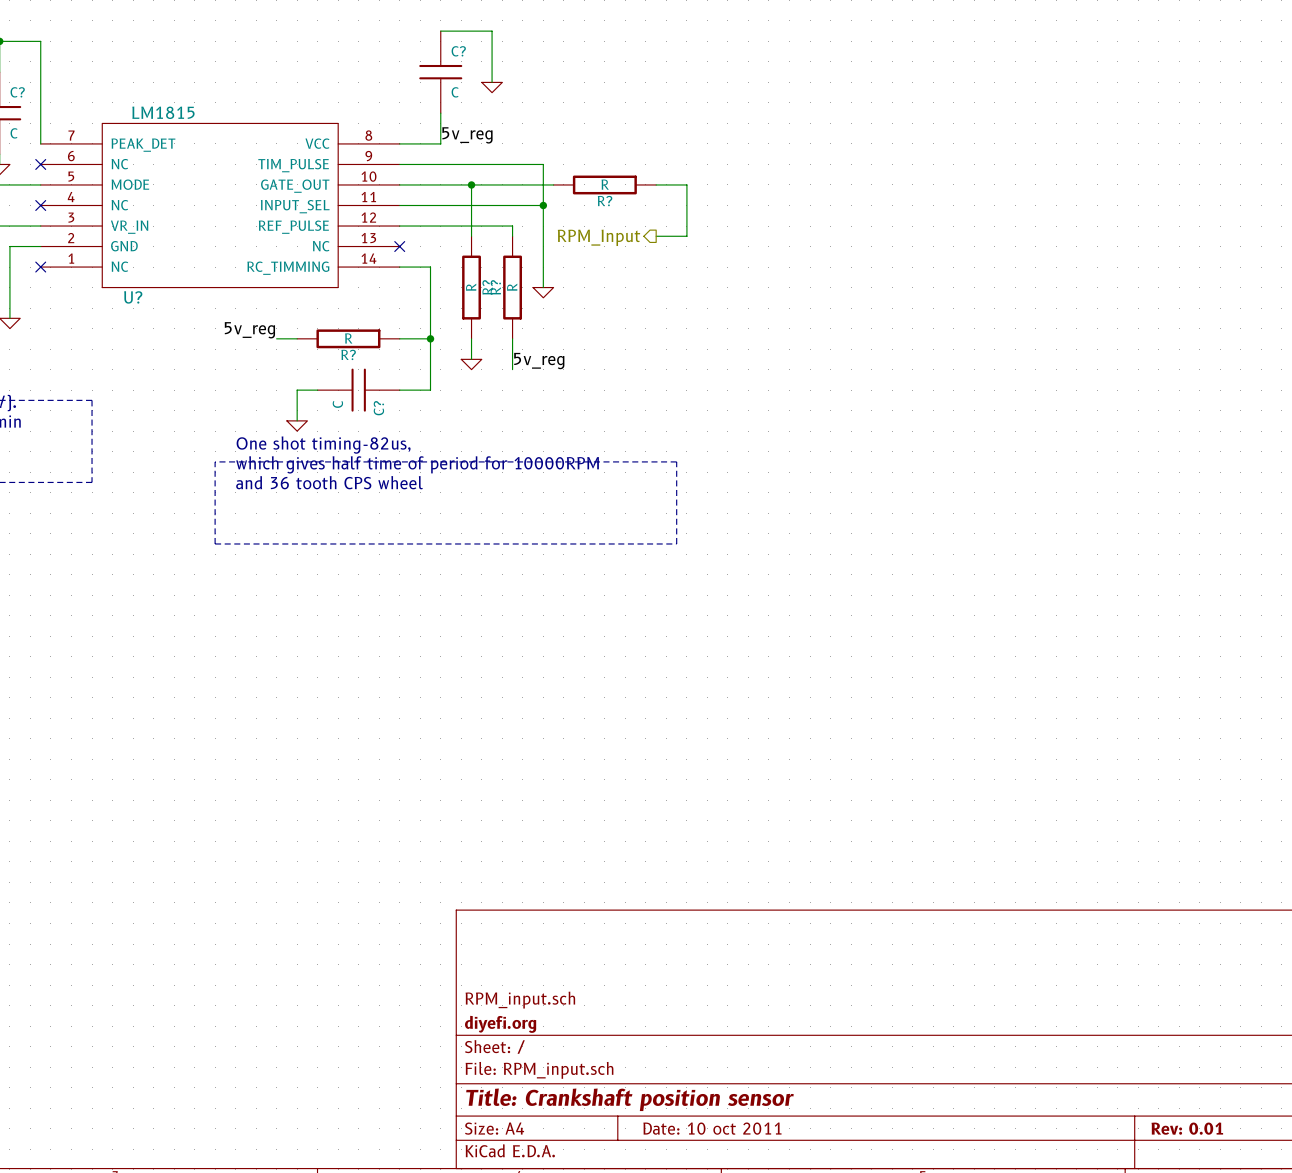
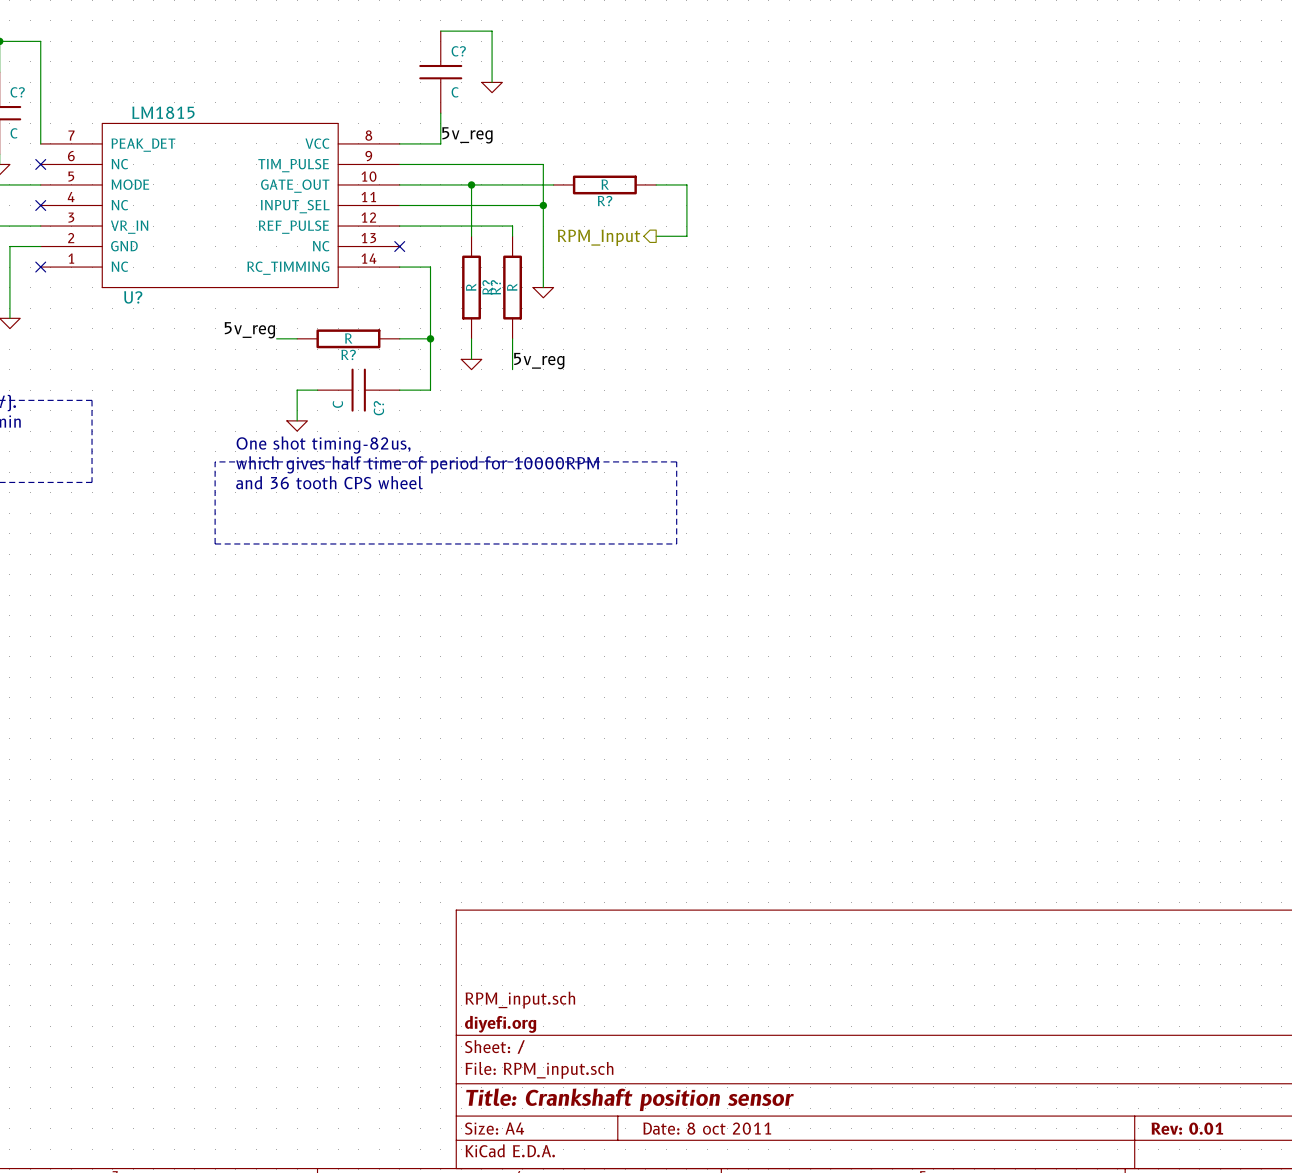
title block: Date: 10 oct 2011 (712, 1128) -> Date: 8 oct 2011 (707, 1128)

